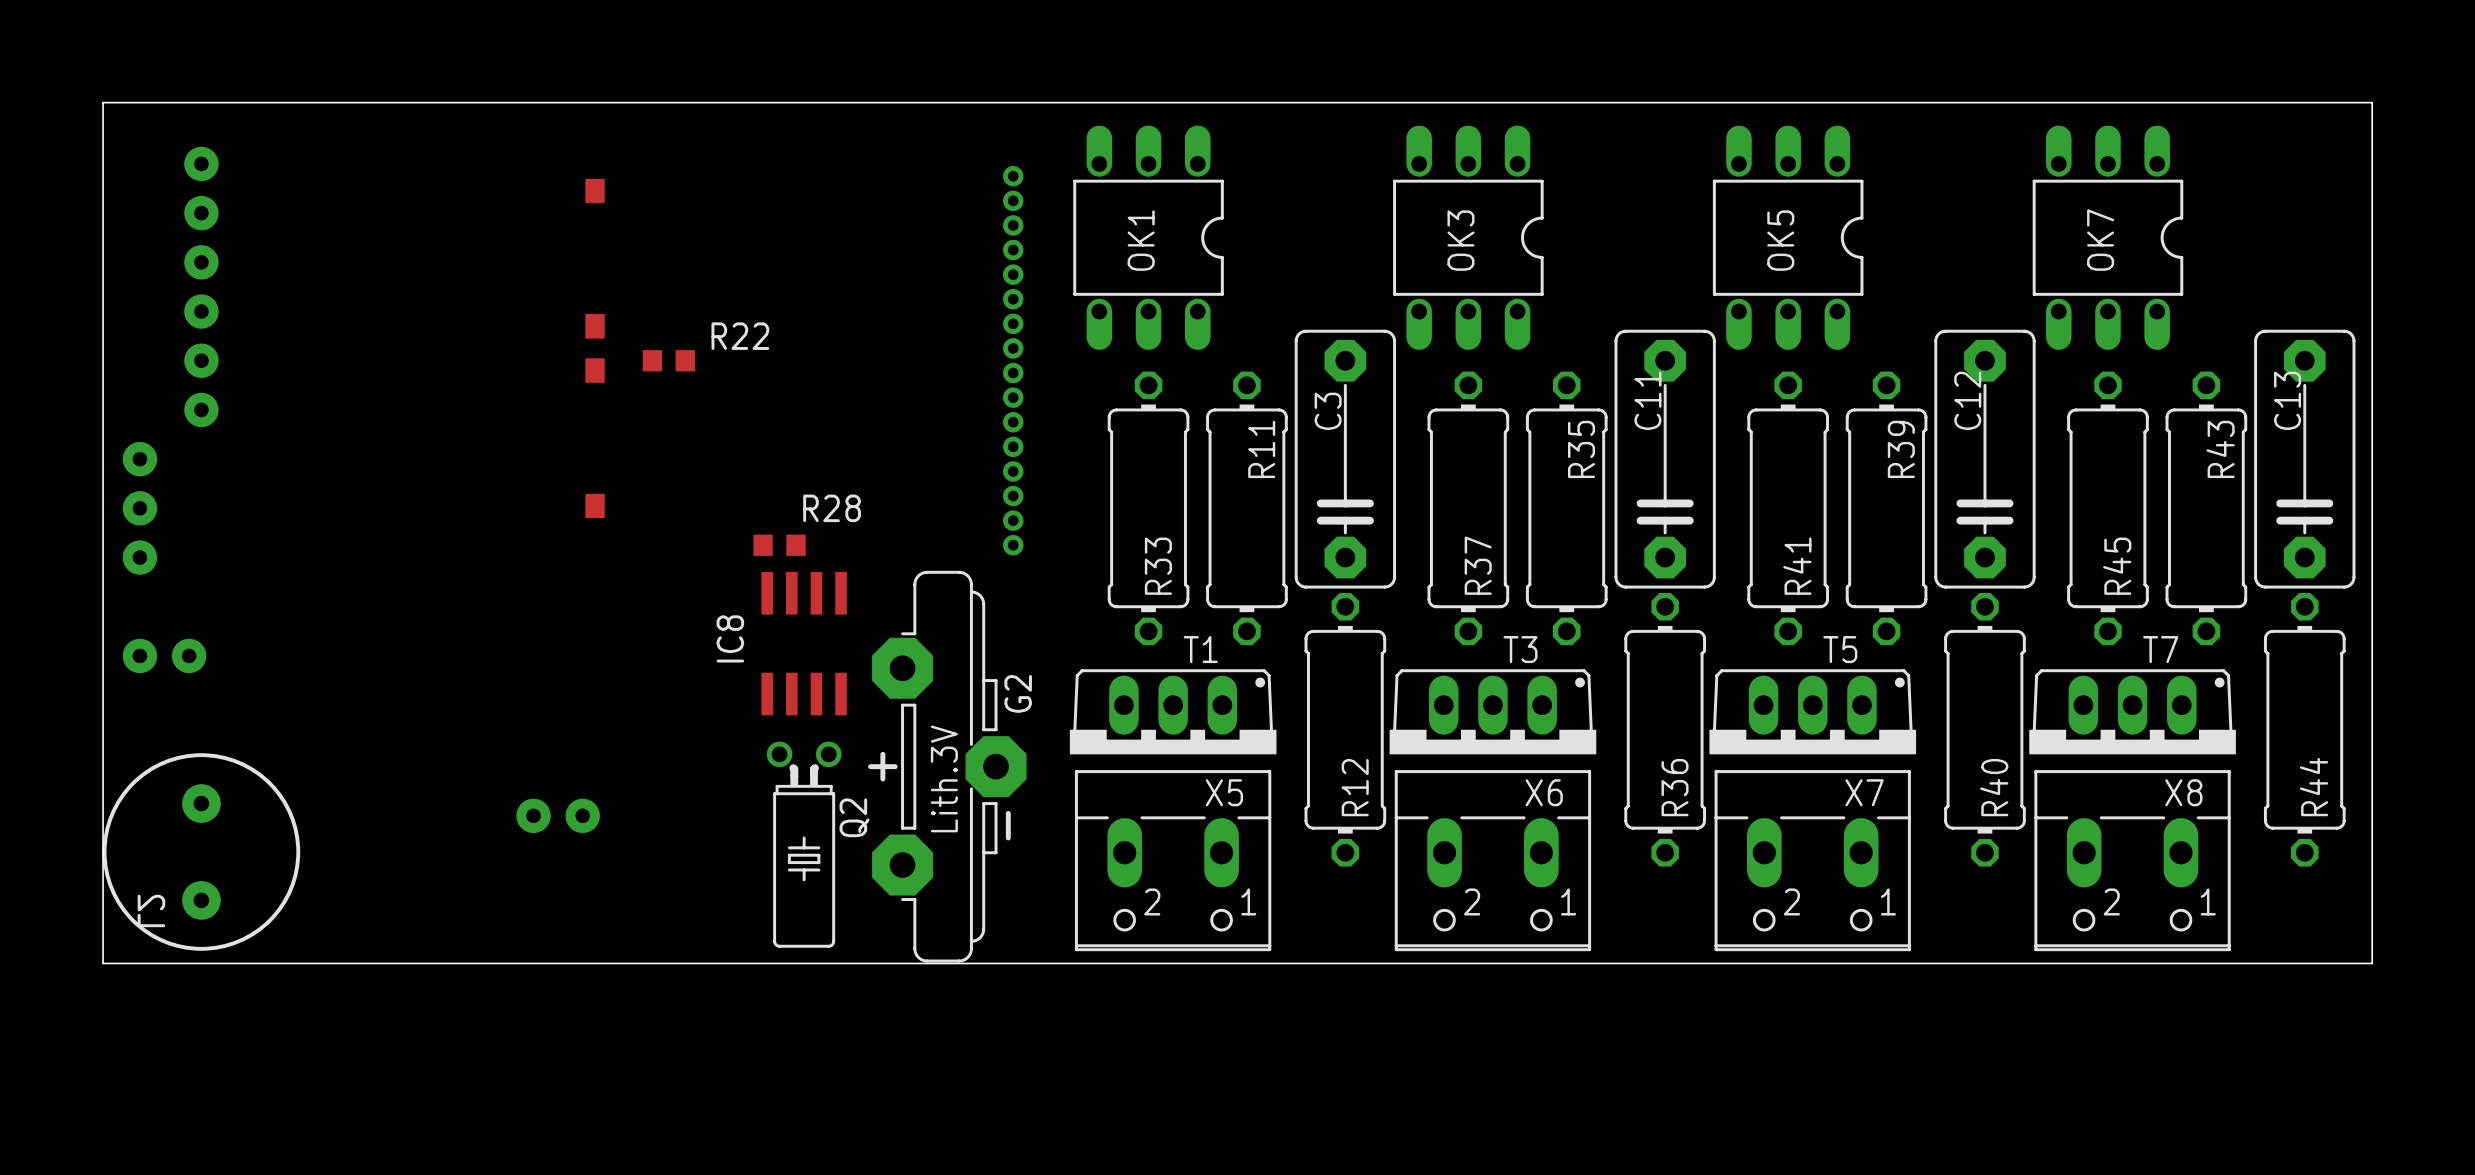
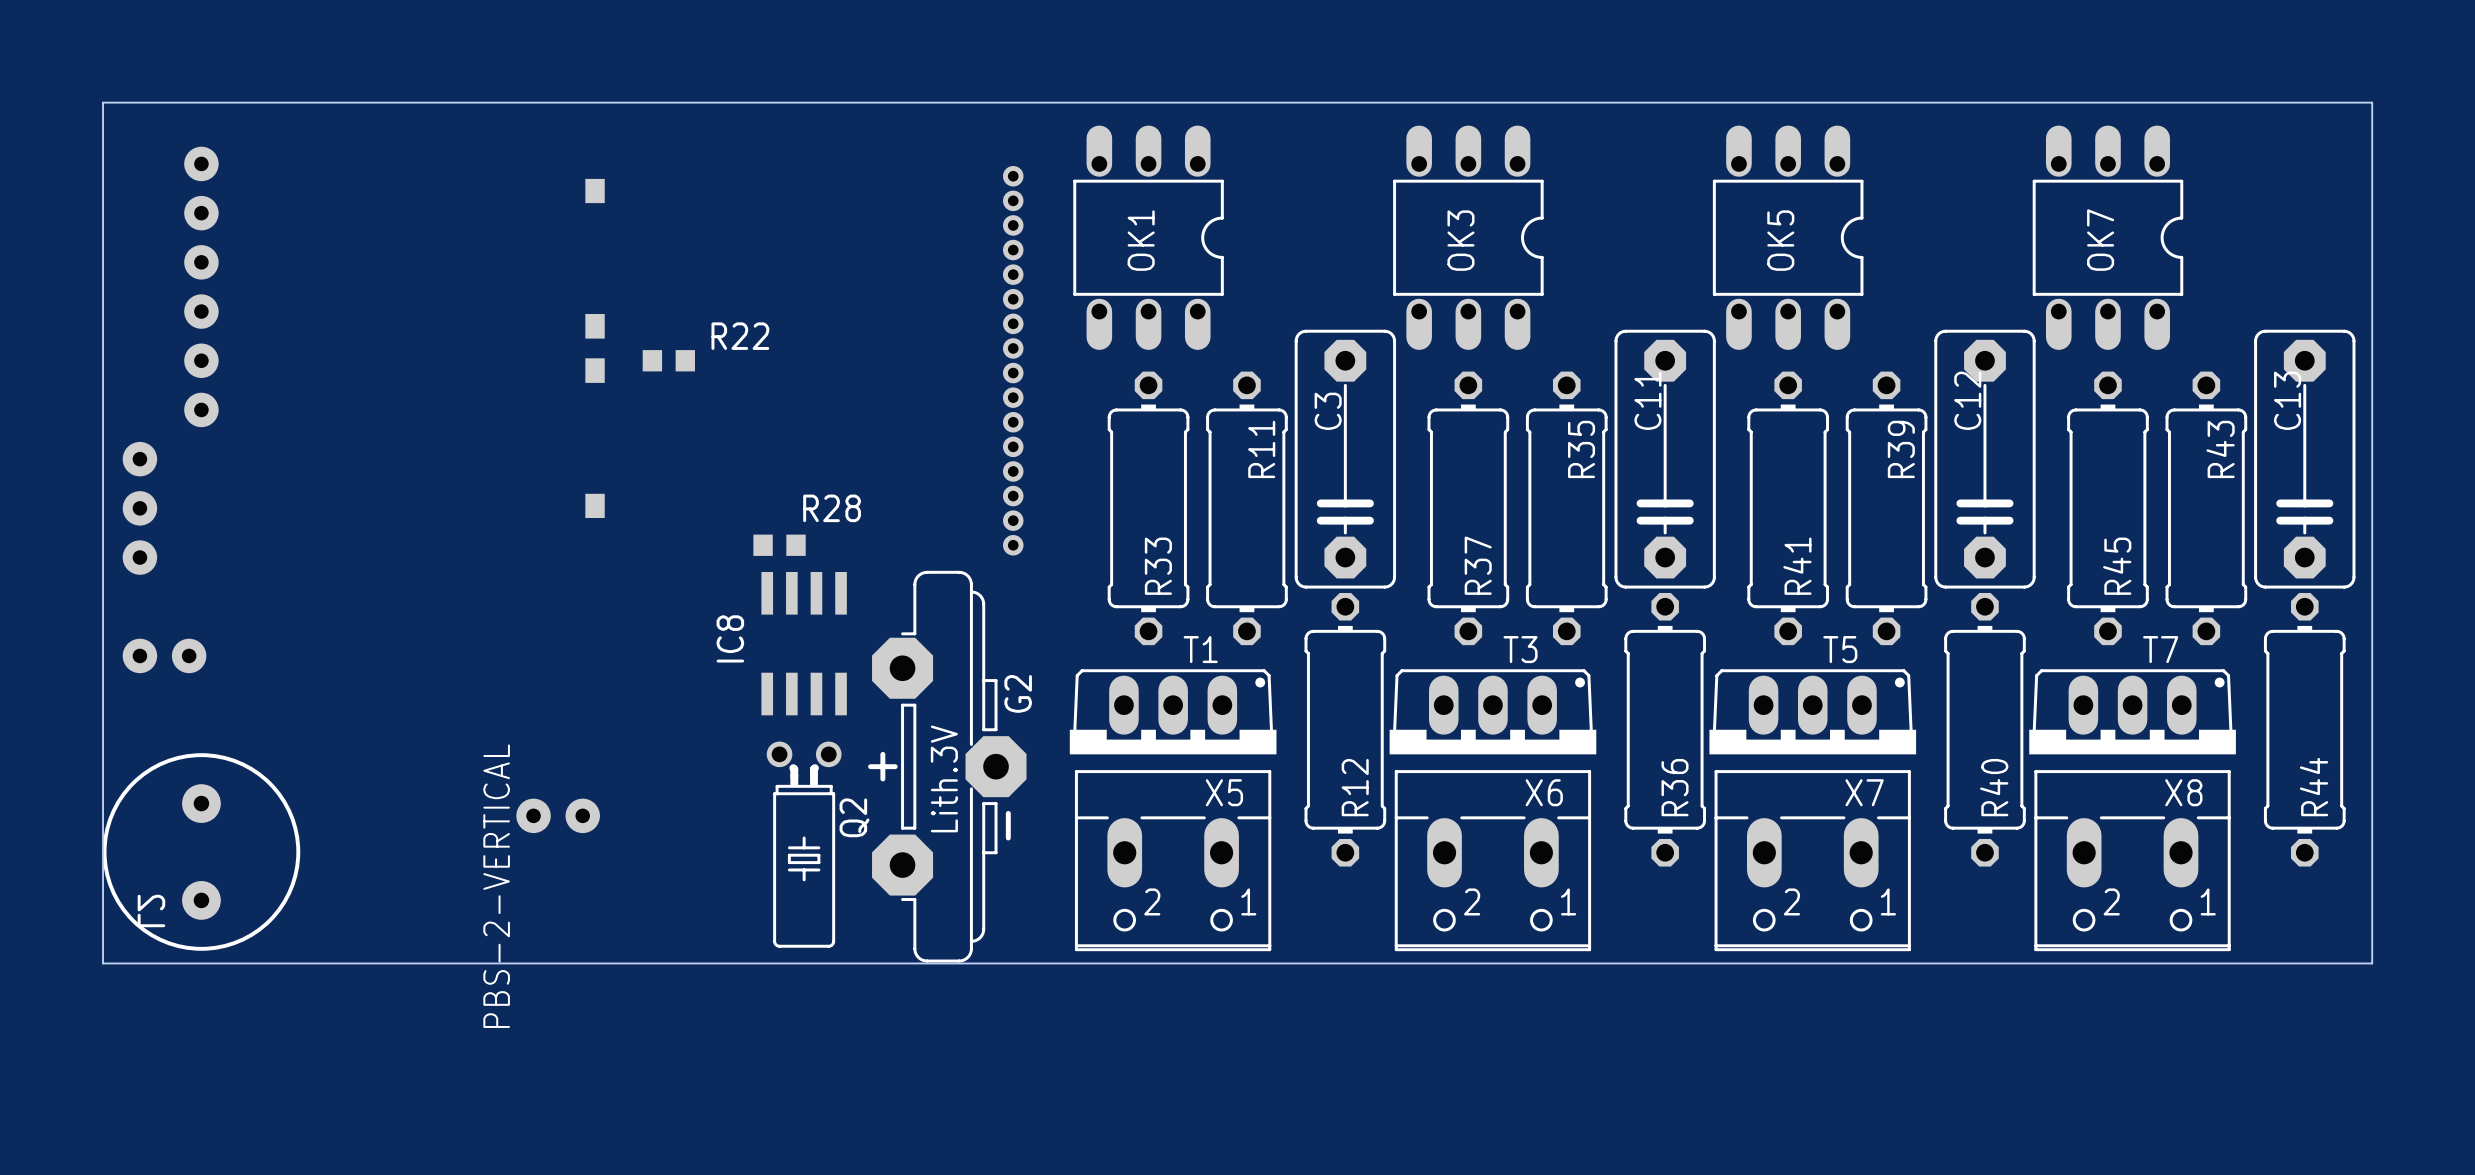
part value: none -> PBS-2-VERTICAL (496, 886)

